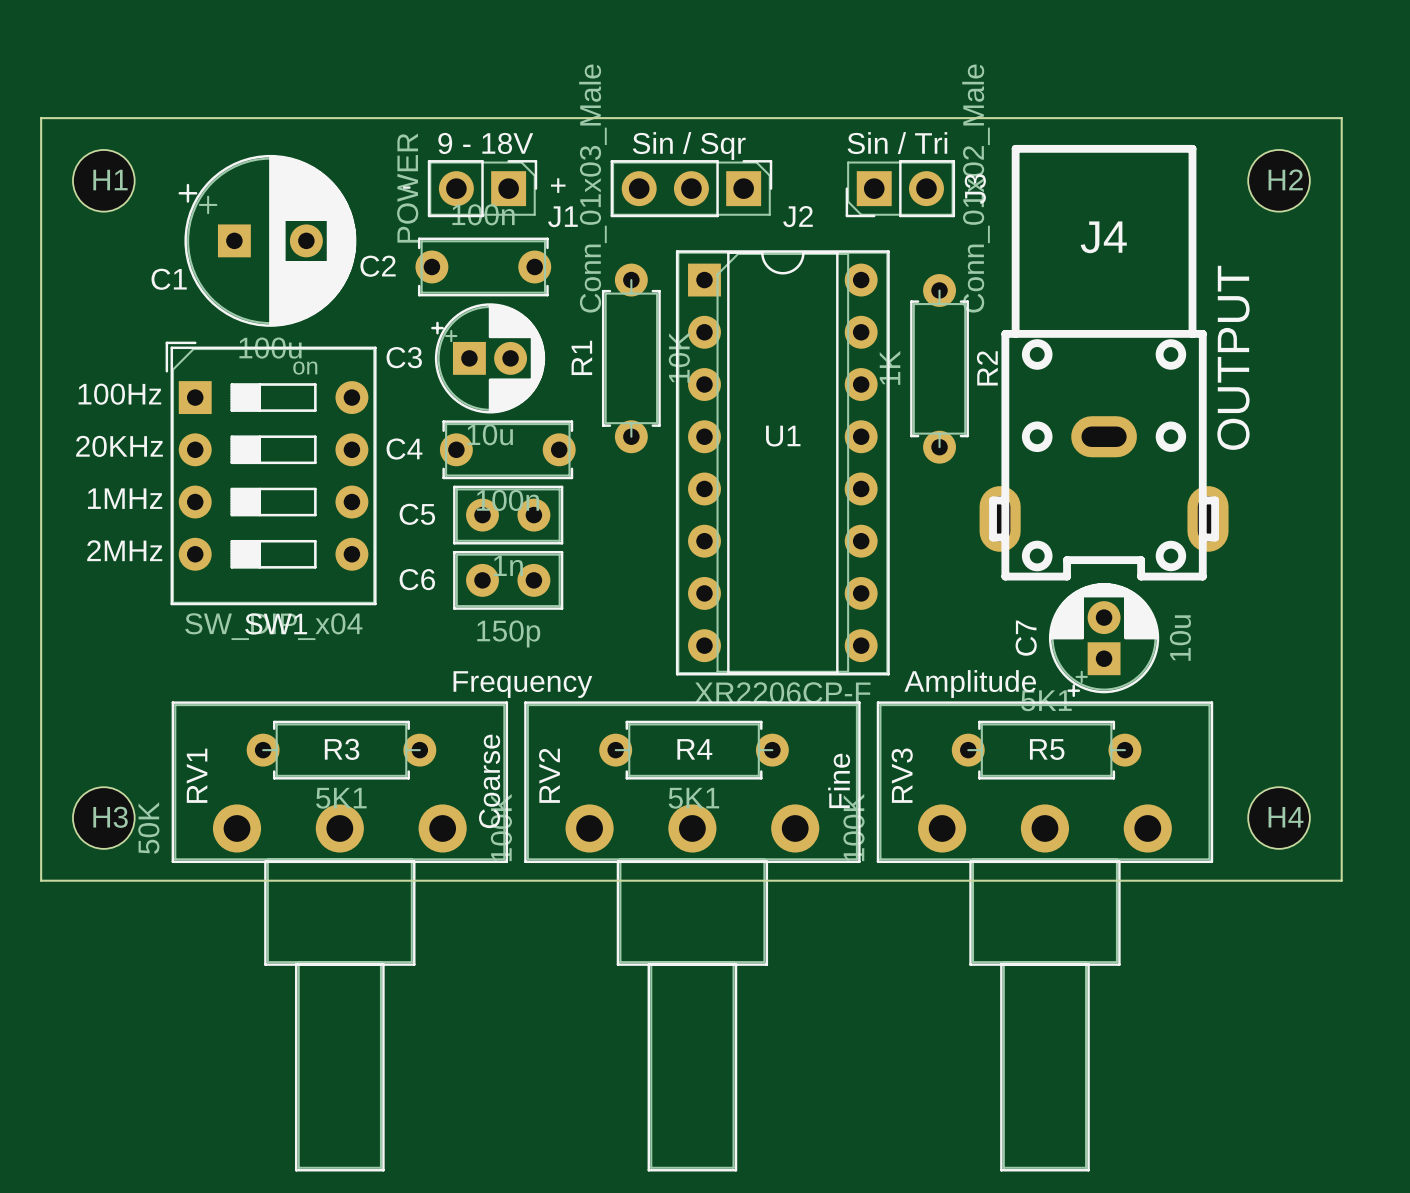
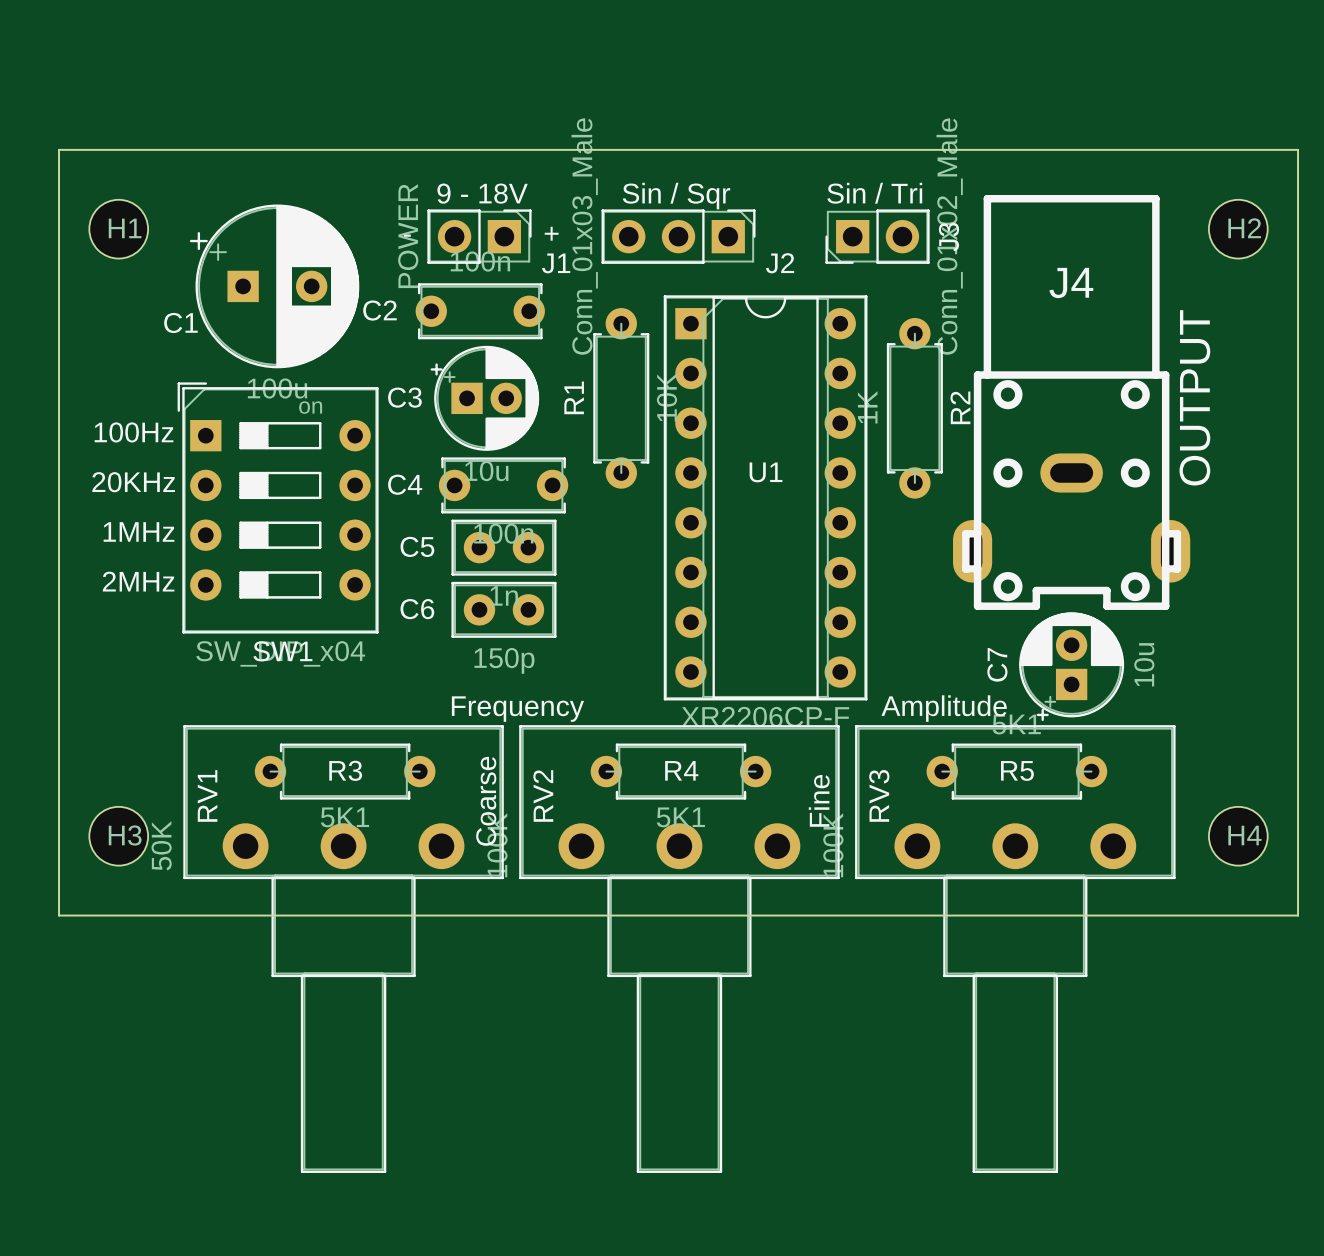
board edge: (41, 118) (1341, 118) -> (59, 169) (59, 149) (1298, 149) (1298, 169)
board edge: (41, 880) (1341, 880) -> (59, 895) (59, 915) (1298, 915) (1298, 895)

